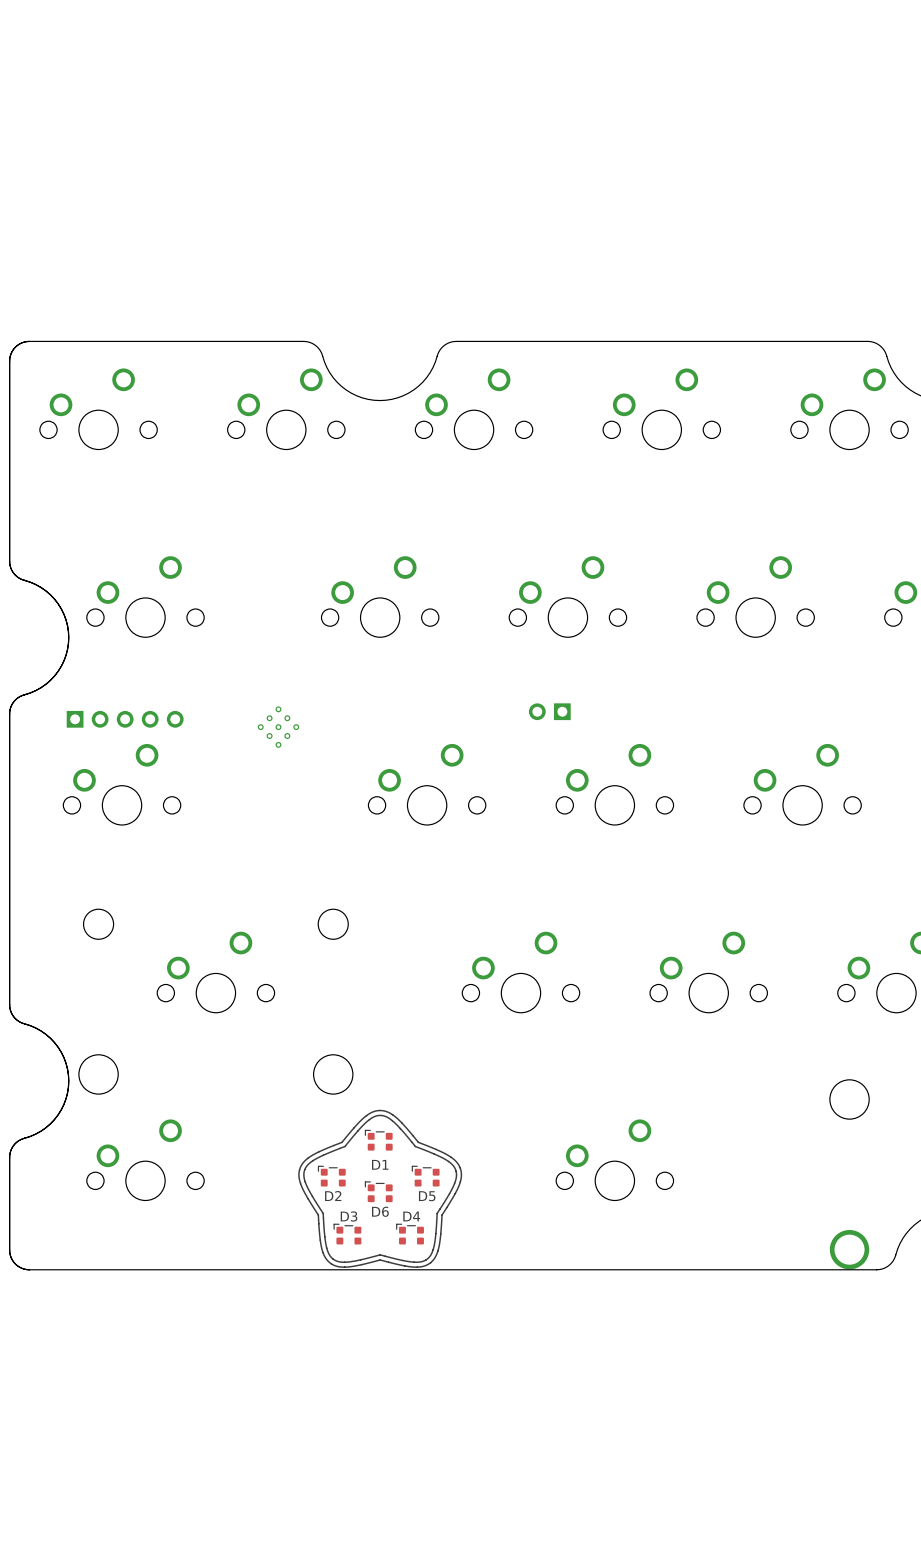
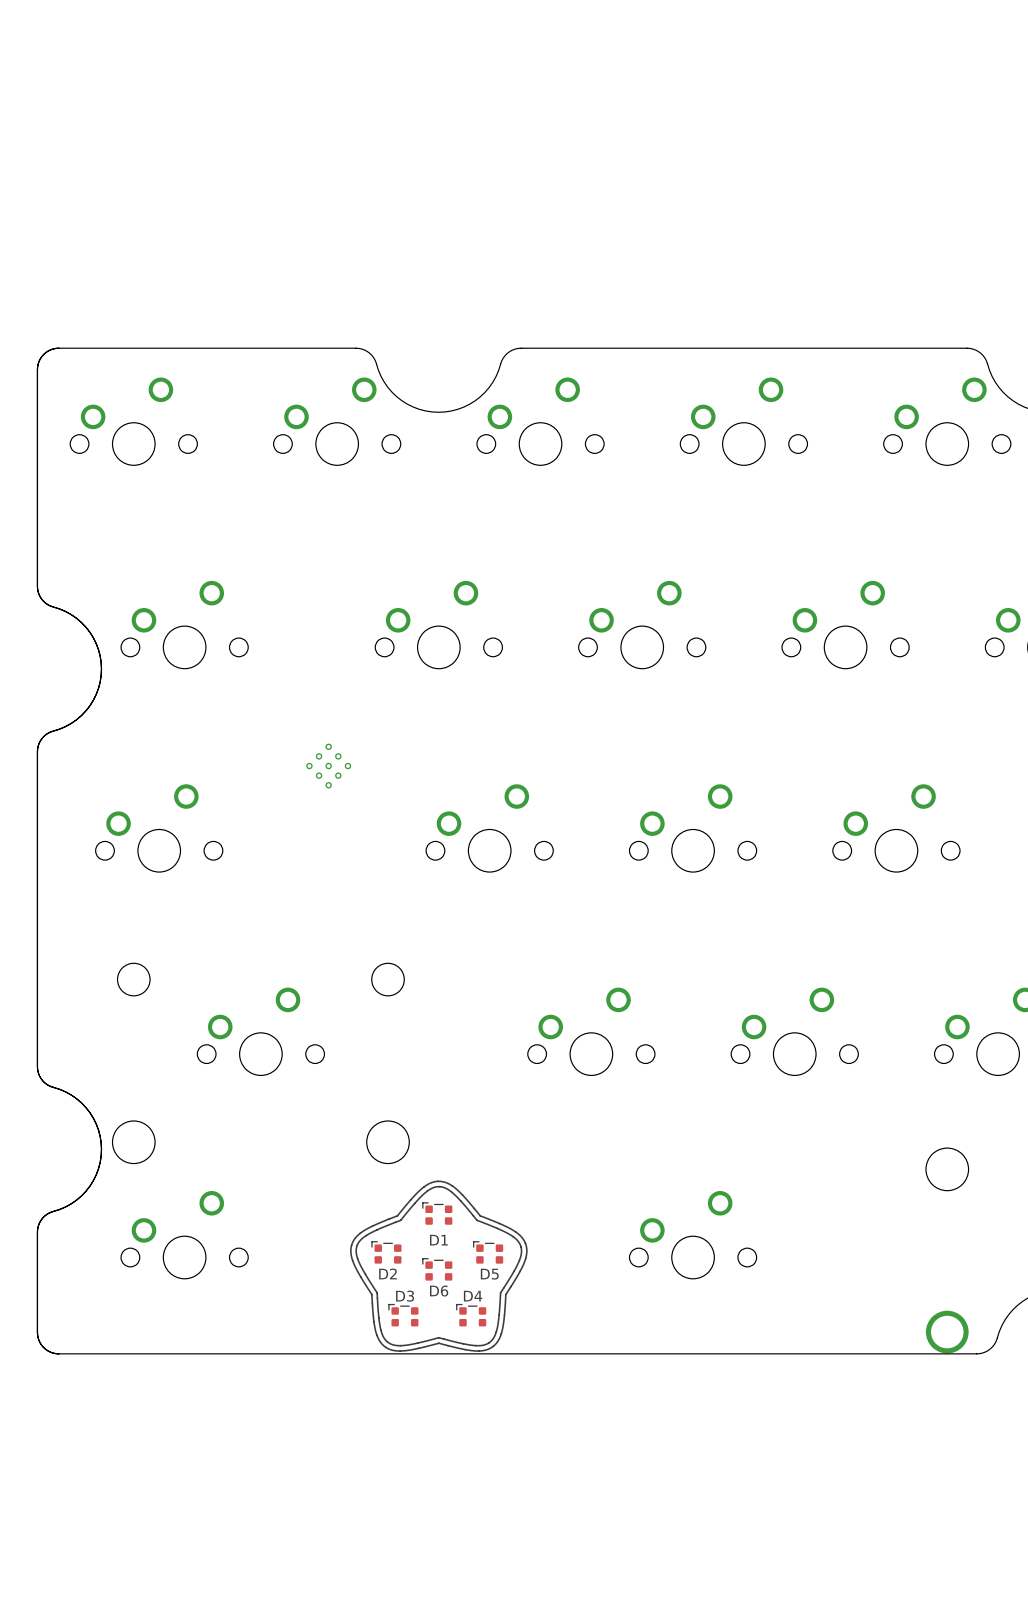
part: (549, 711) -> none
part: (125, 719) -> none

